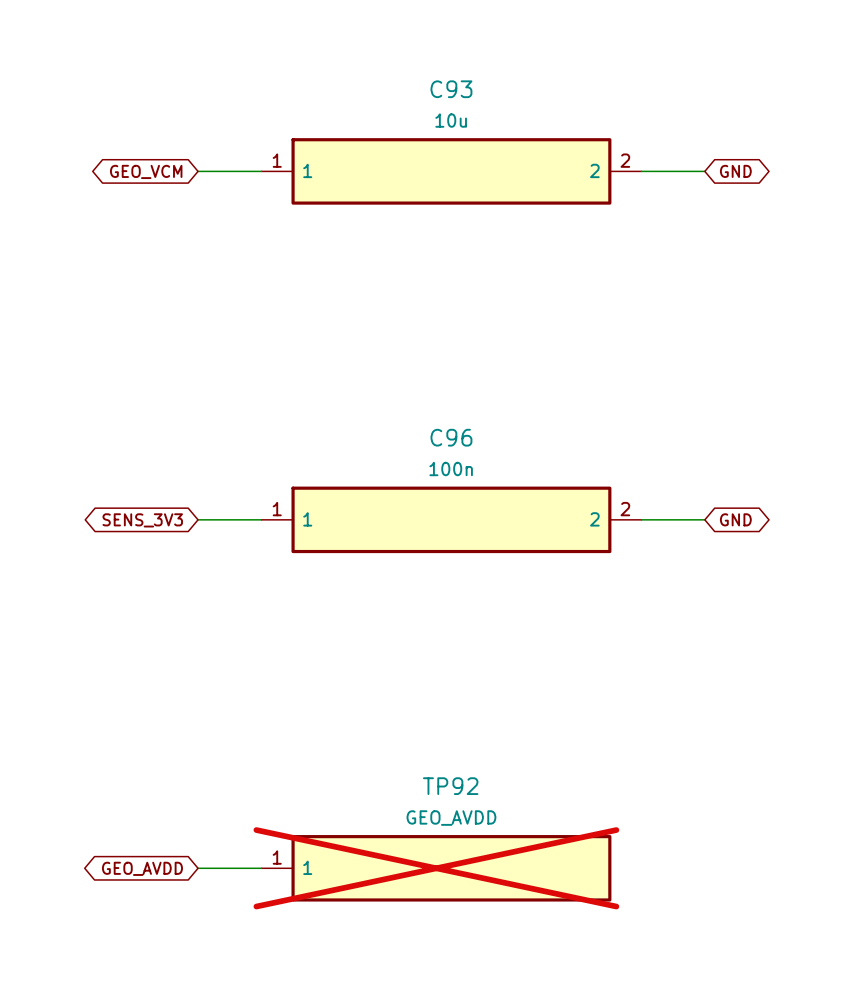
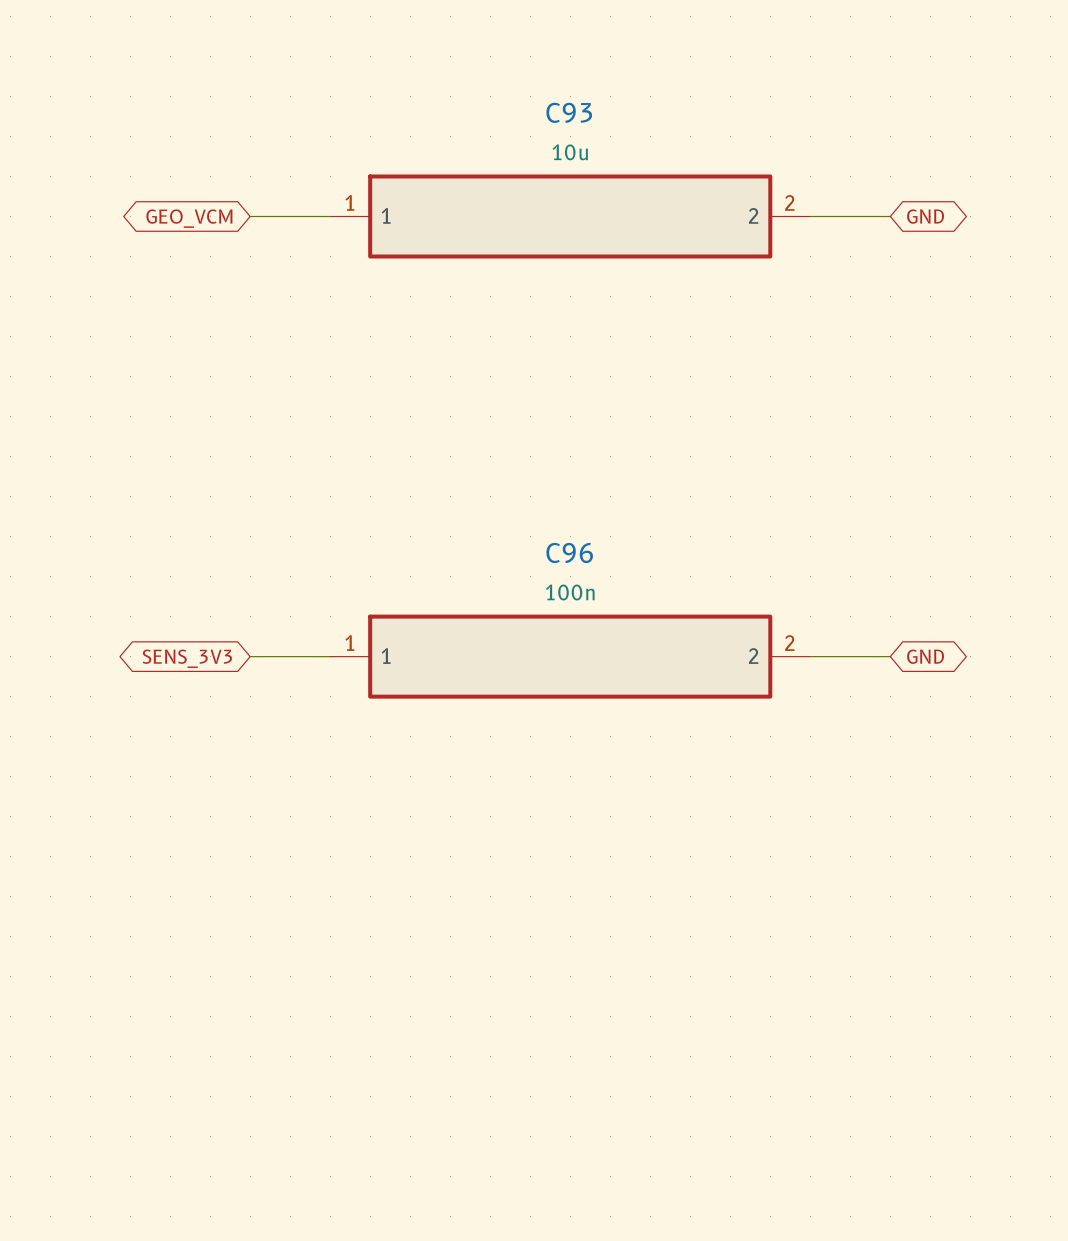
global label: GEO_AVDD (142, 868) -> none
wire: (198, 868) (261, 868) -> none
TP92: GEO_AVDD (436, 868) -> none

